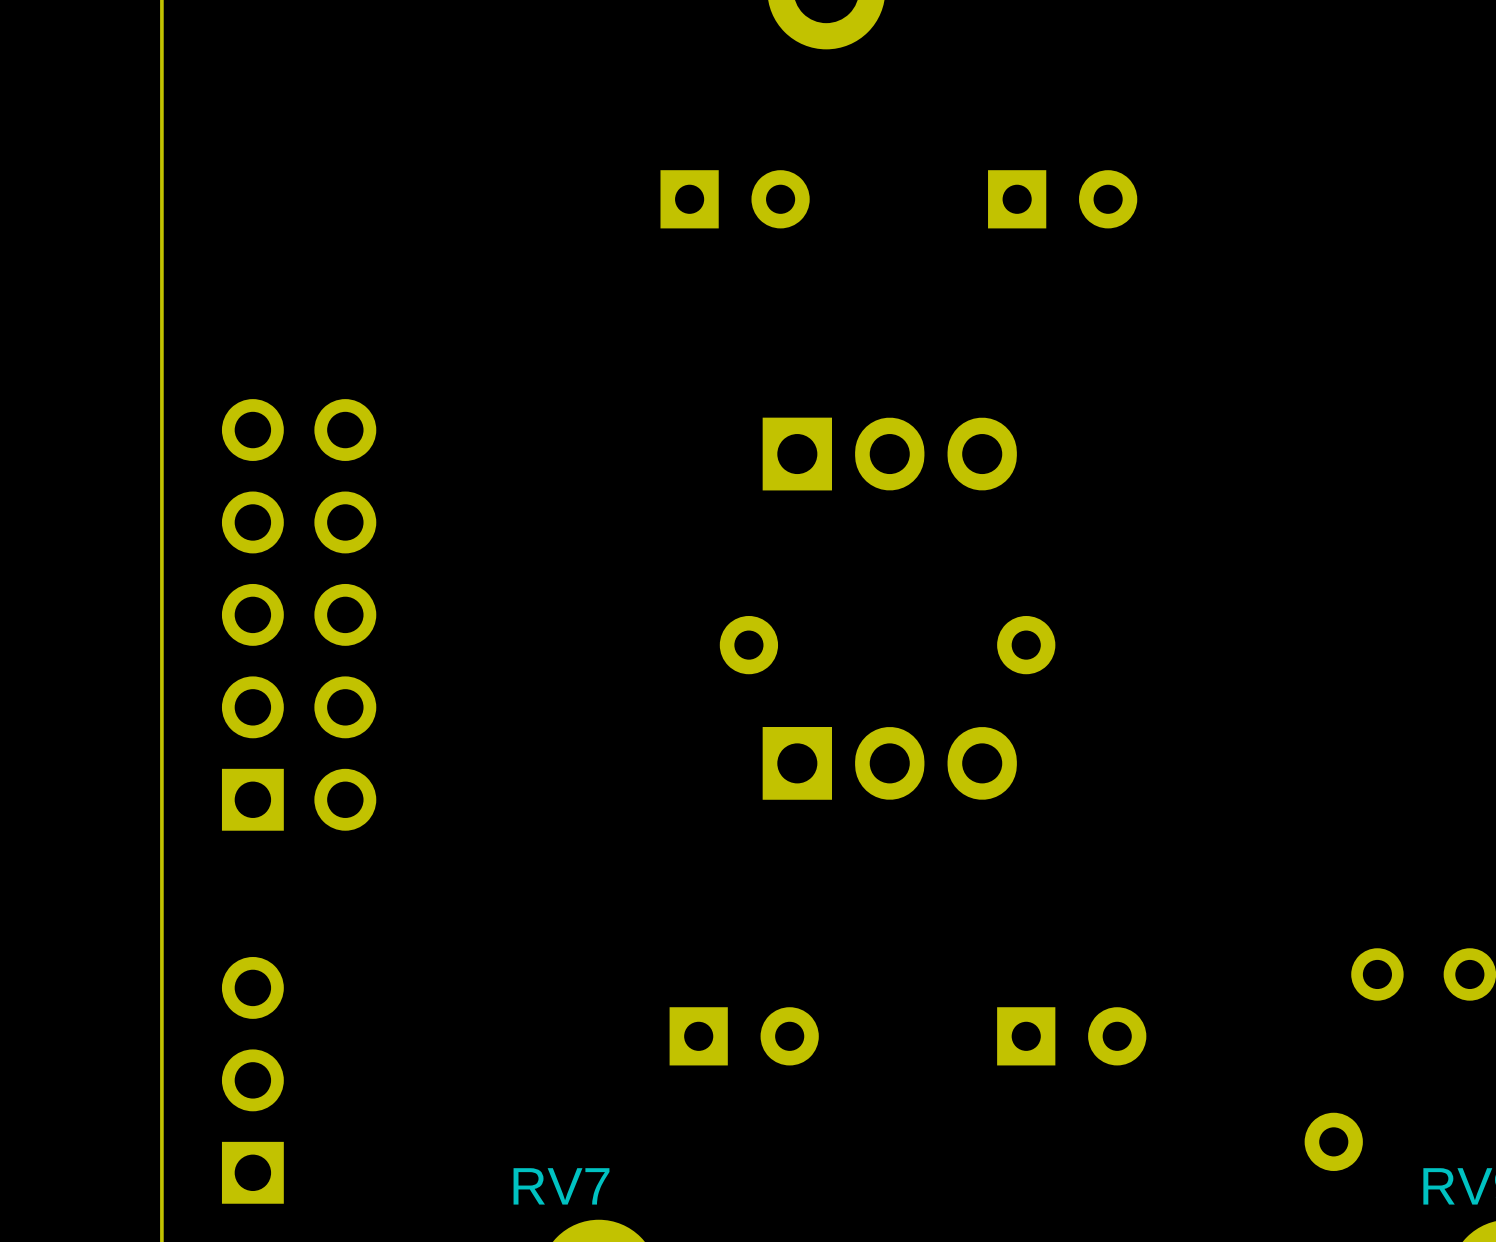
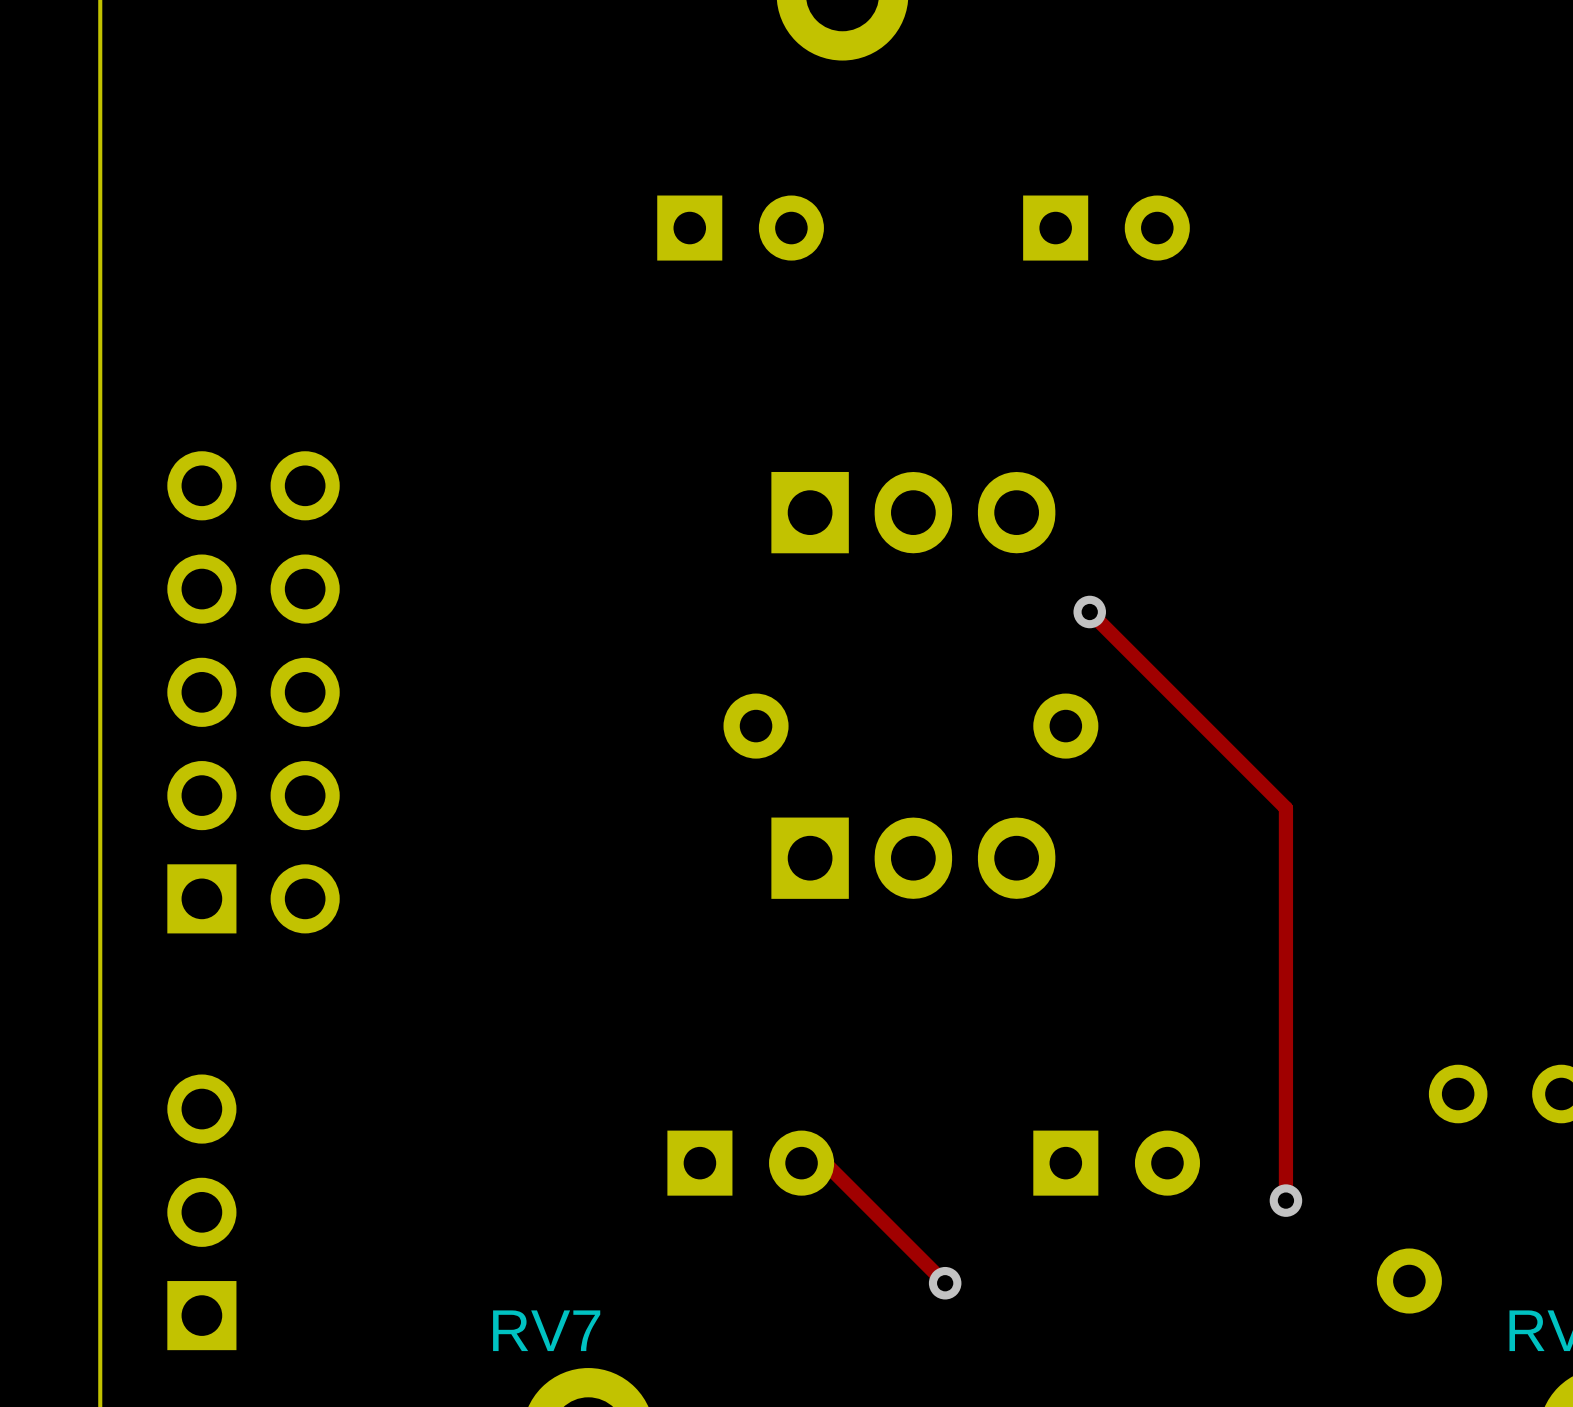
track: none -> (1089, 611) (1285, 808) (1285, 1200)
via: none -> (1089, 611)
track: none -> (801, 1163) (825, 1163) (945, 1283)
via: none -> (1285, 1200)
via: none -> (945, 1283)

